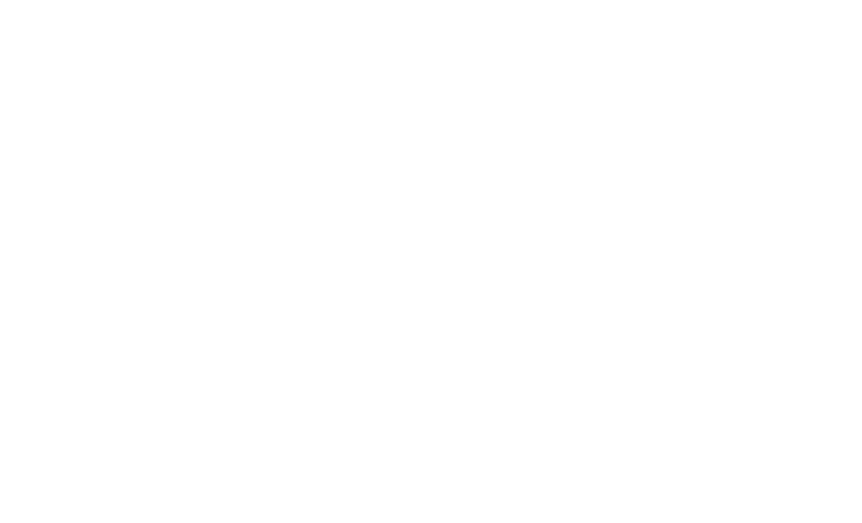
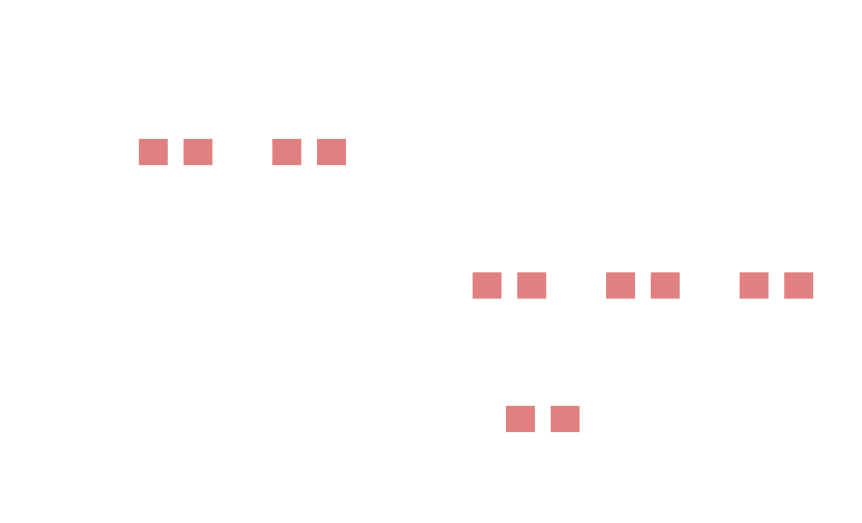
part: none -> (175, 151)
part: none -> (309, 151)
part: none -> (509, 285)
part: none -> (642, 285)
part: none -> (776, 285)
part: none -> (542, 418)

